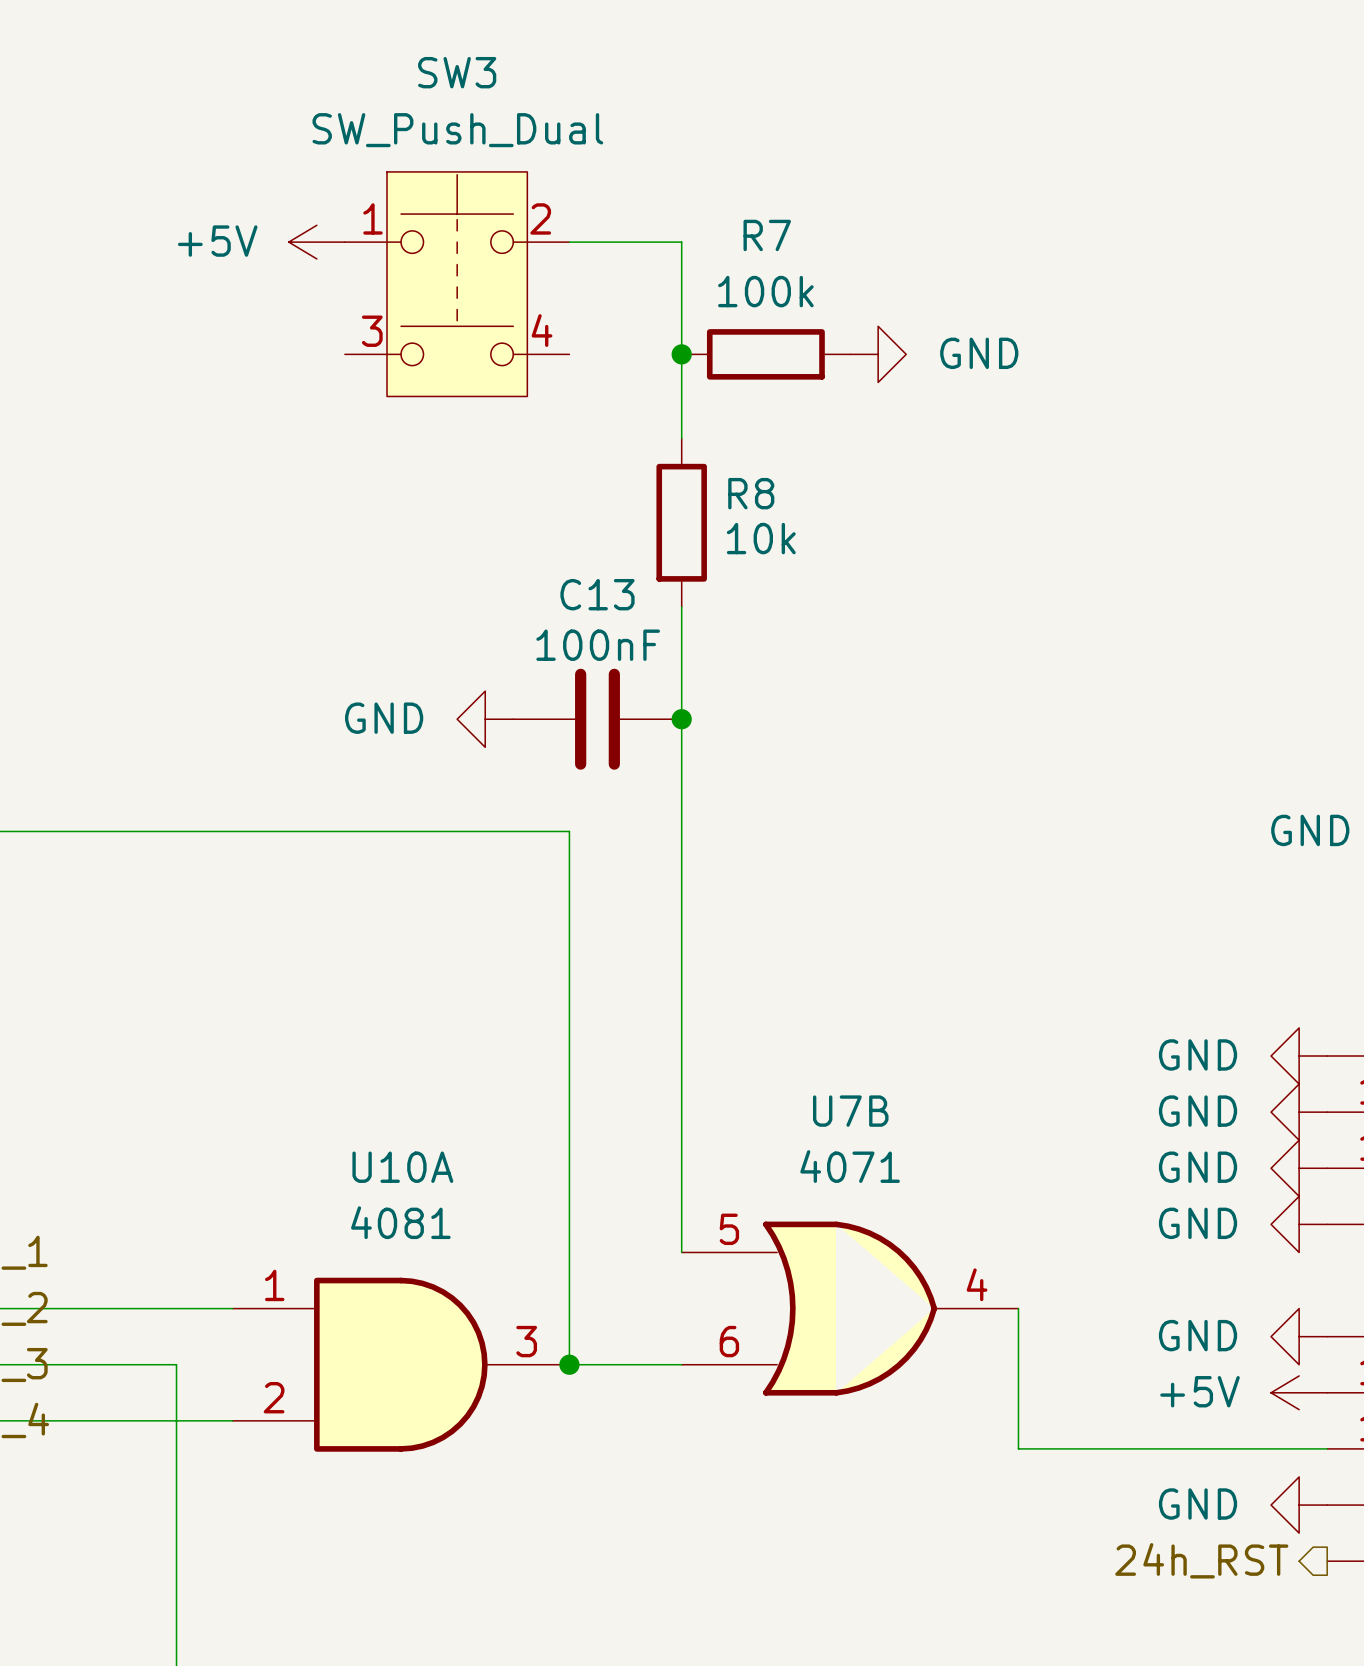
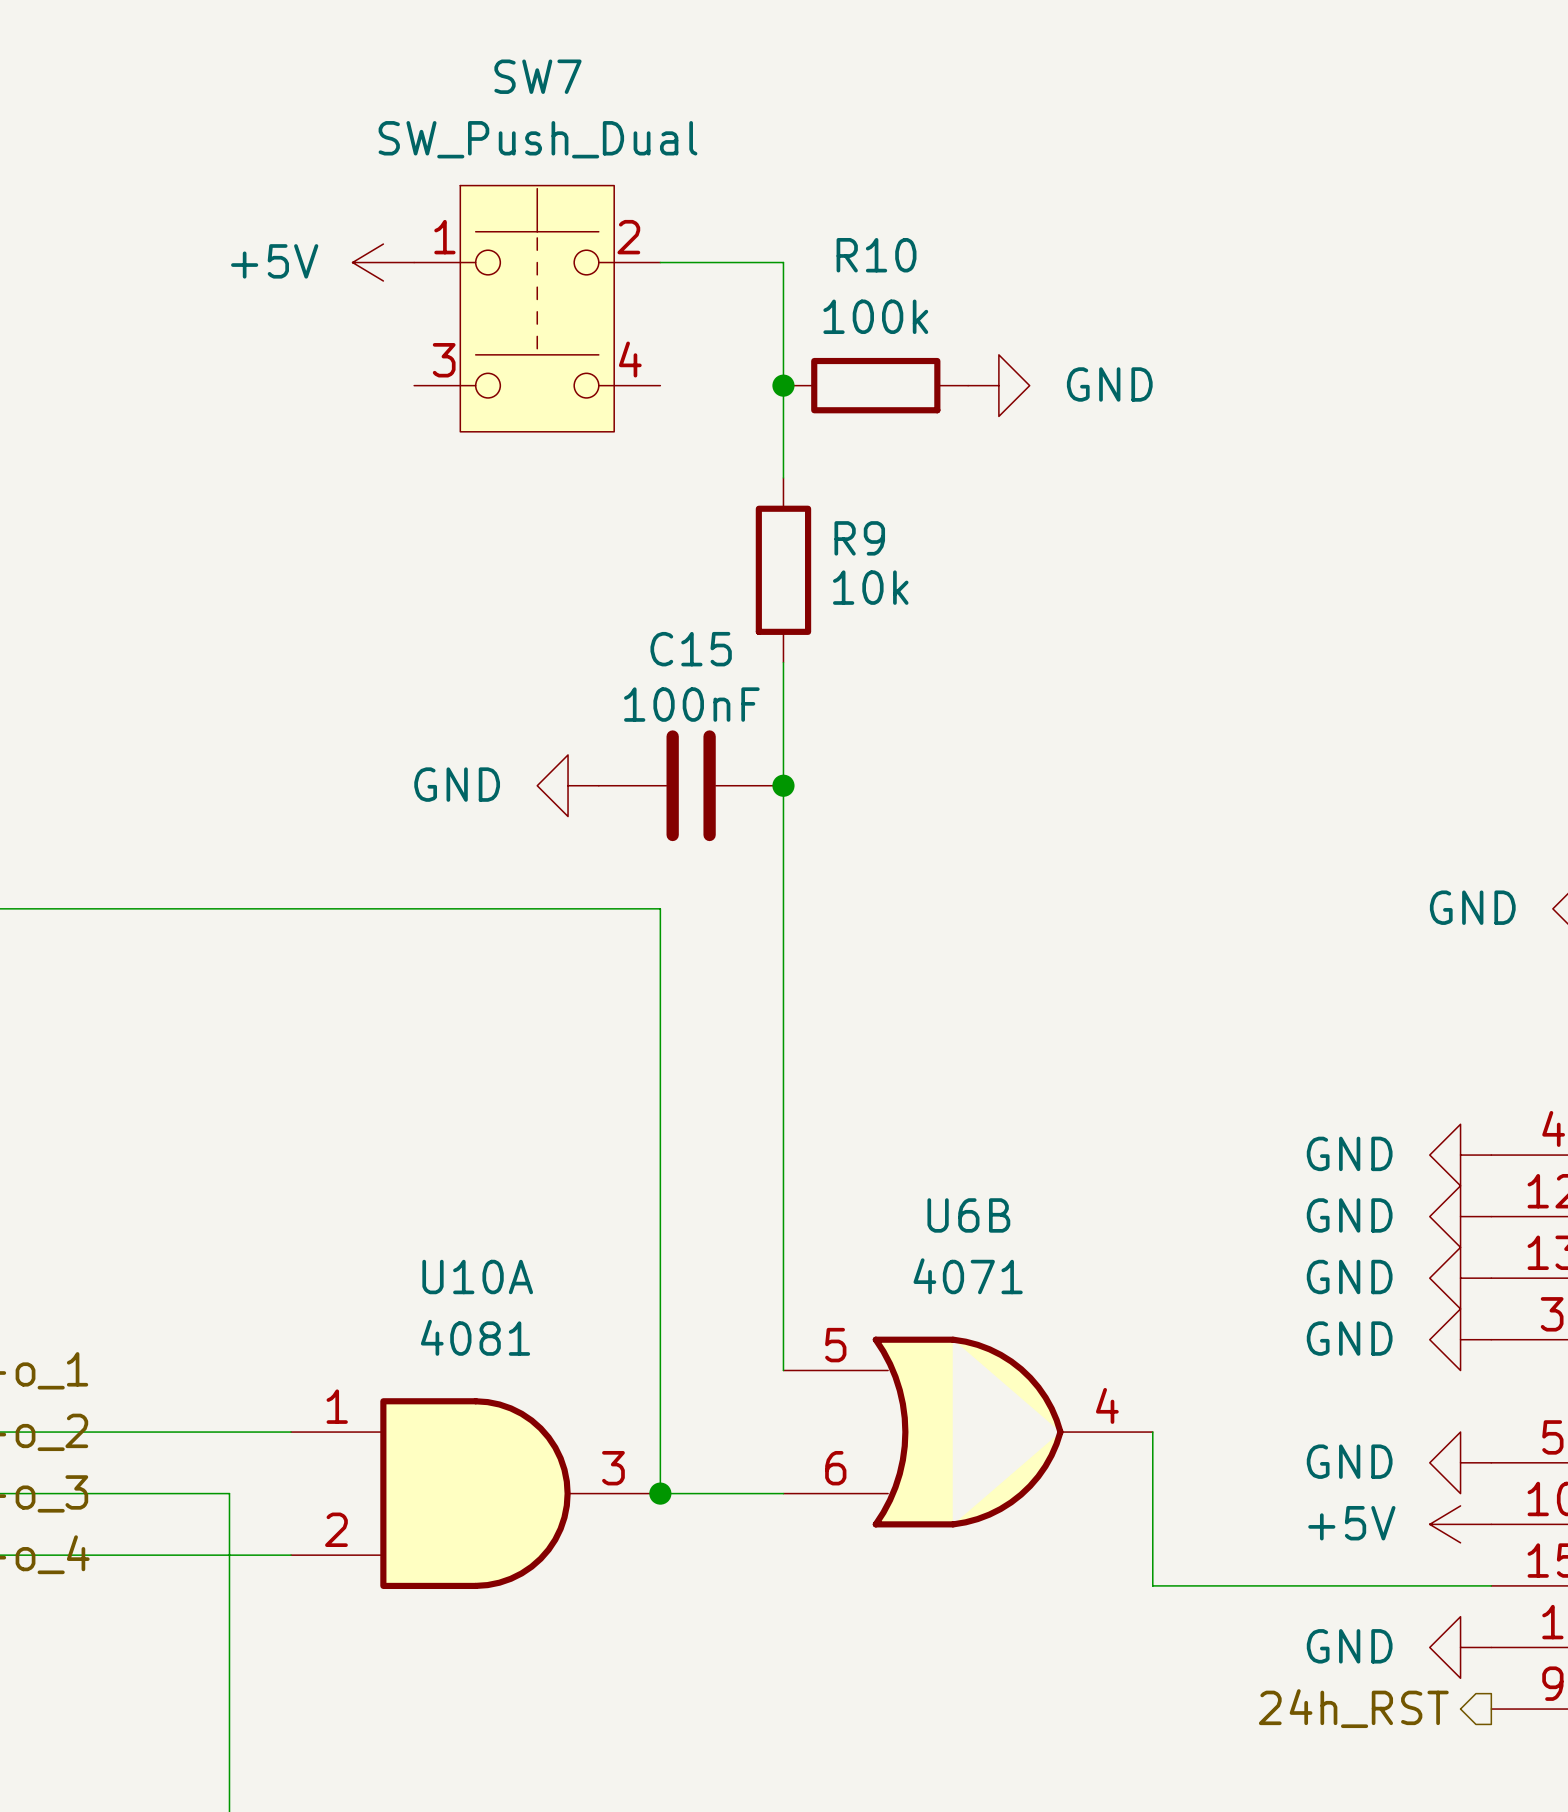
SW3 name: SW3 (457, 72) -> SW7 (537, 76)
R7 name: R7 (767, 235) -> R10 (876, 255)
R8 name: R8 (751, 493) -> R9 (859, 538)
C13 name: C13 (597, 594) -> C15 (691, 649)
U7B name: U7B (850, 1111) -> U6B (968, 1215)

